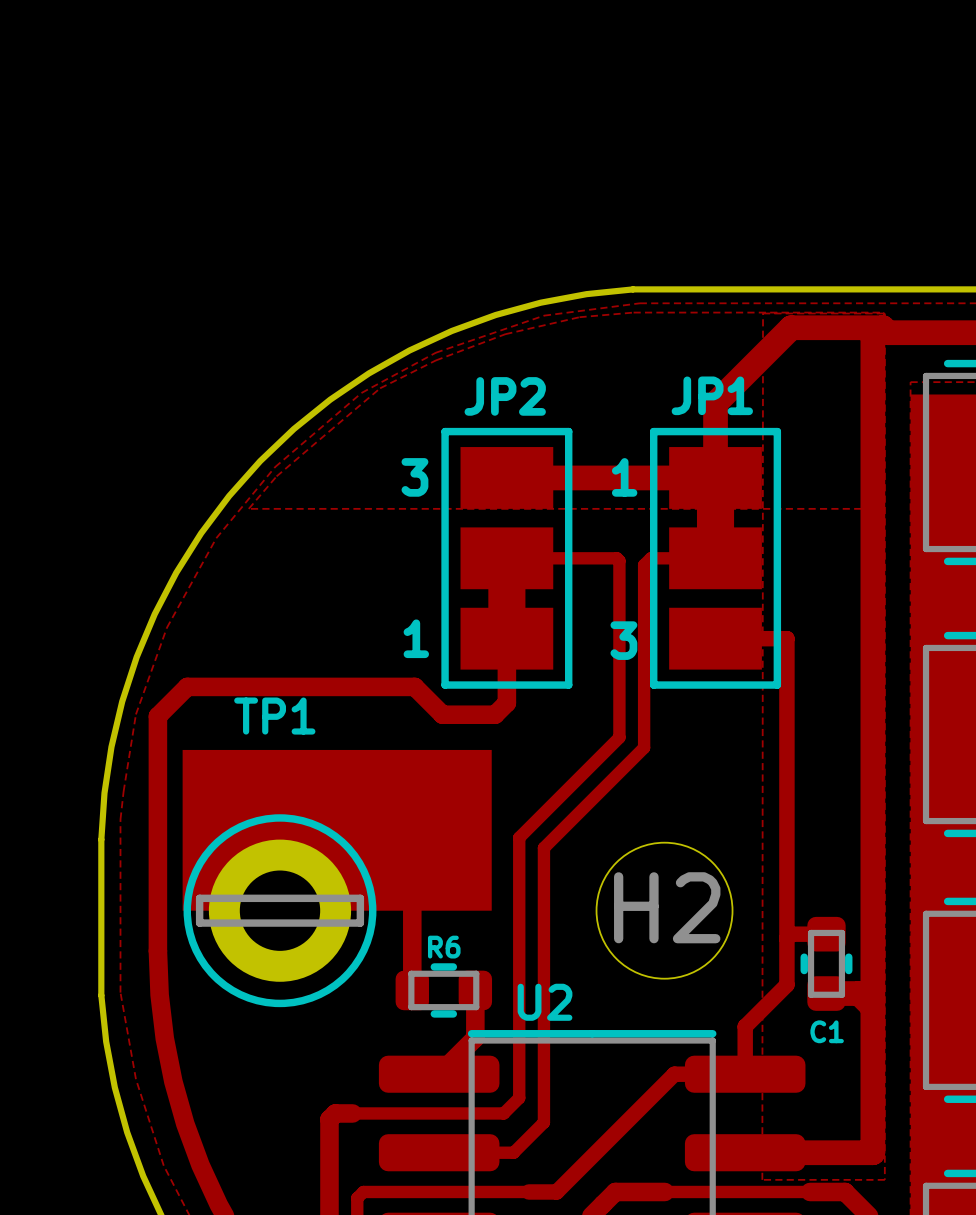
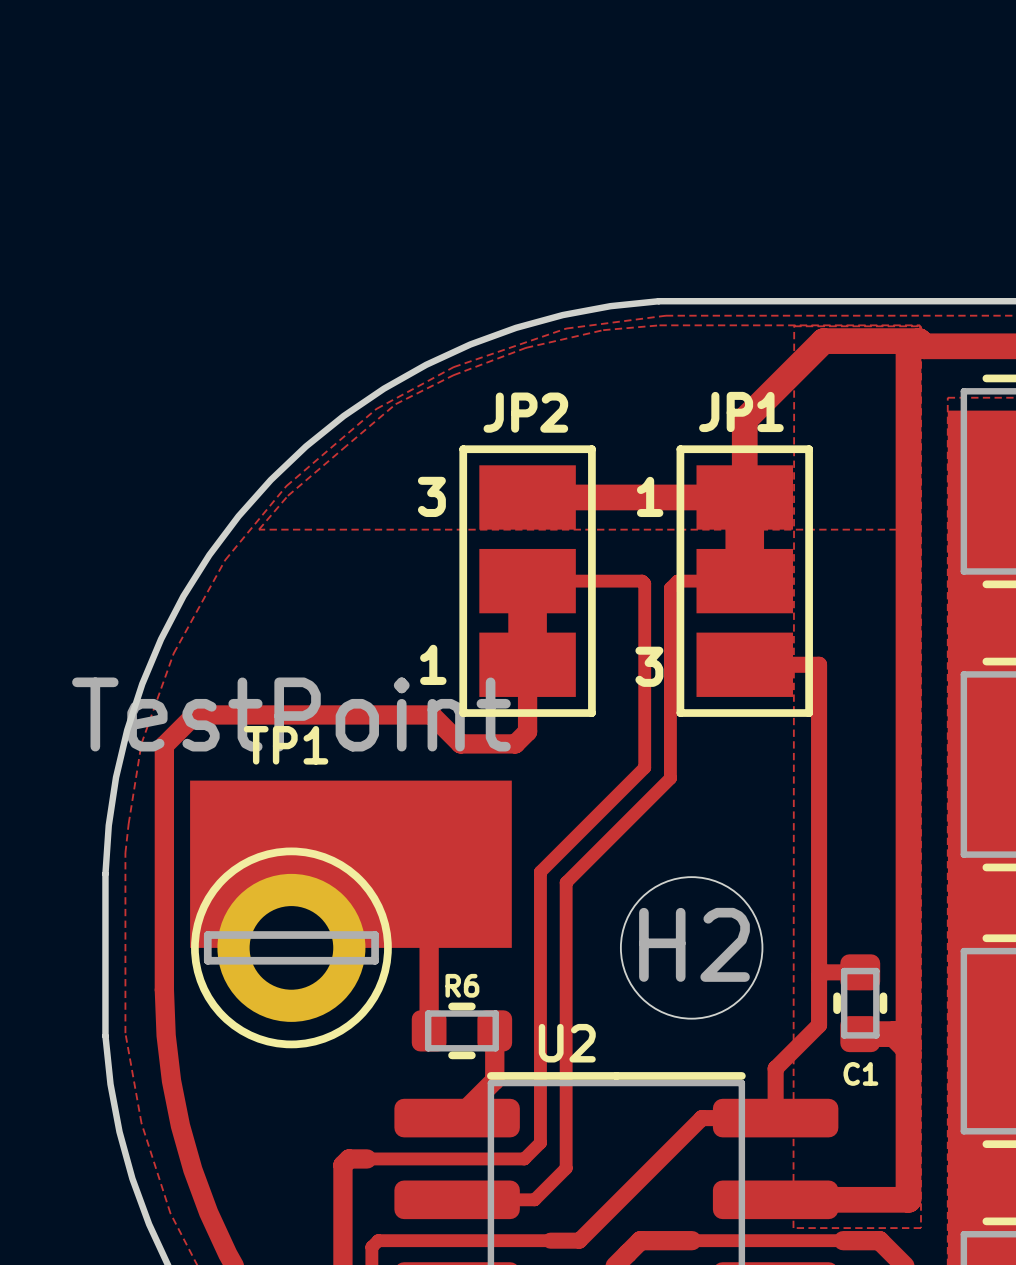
TP1 value: none -> TestPoint (291, 714)

